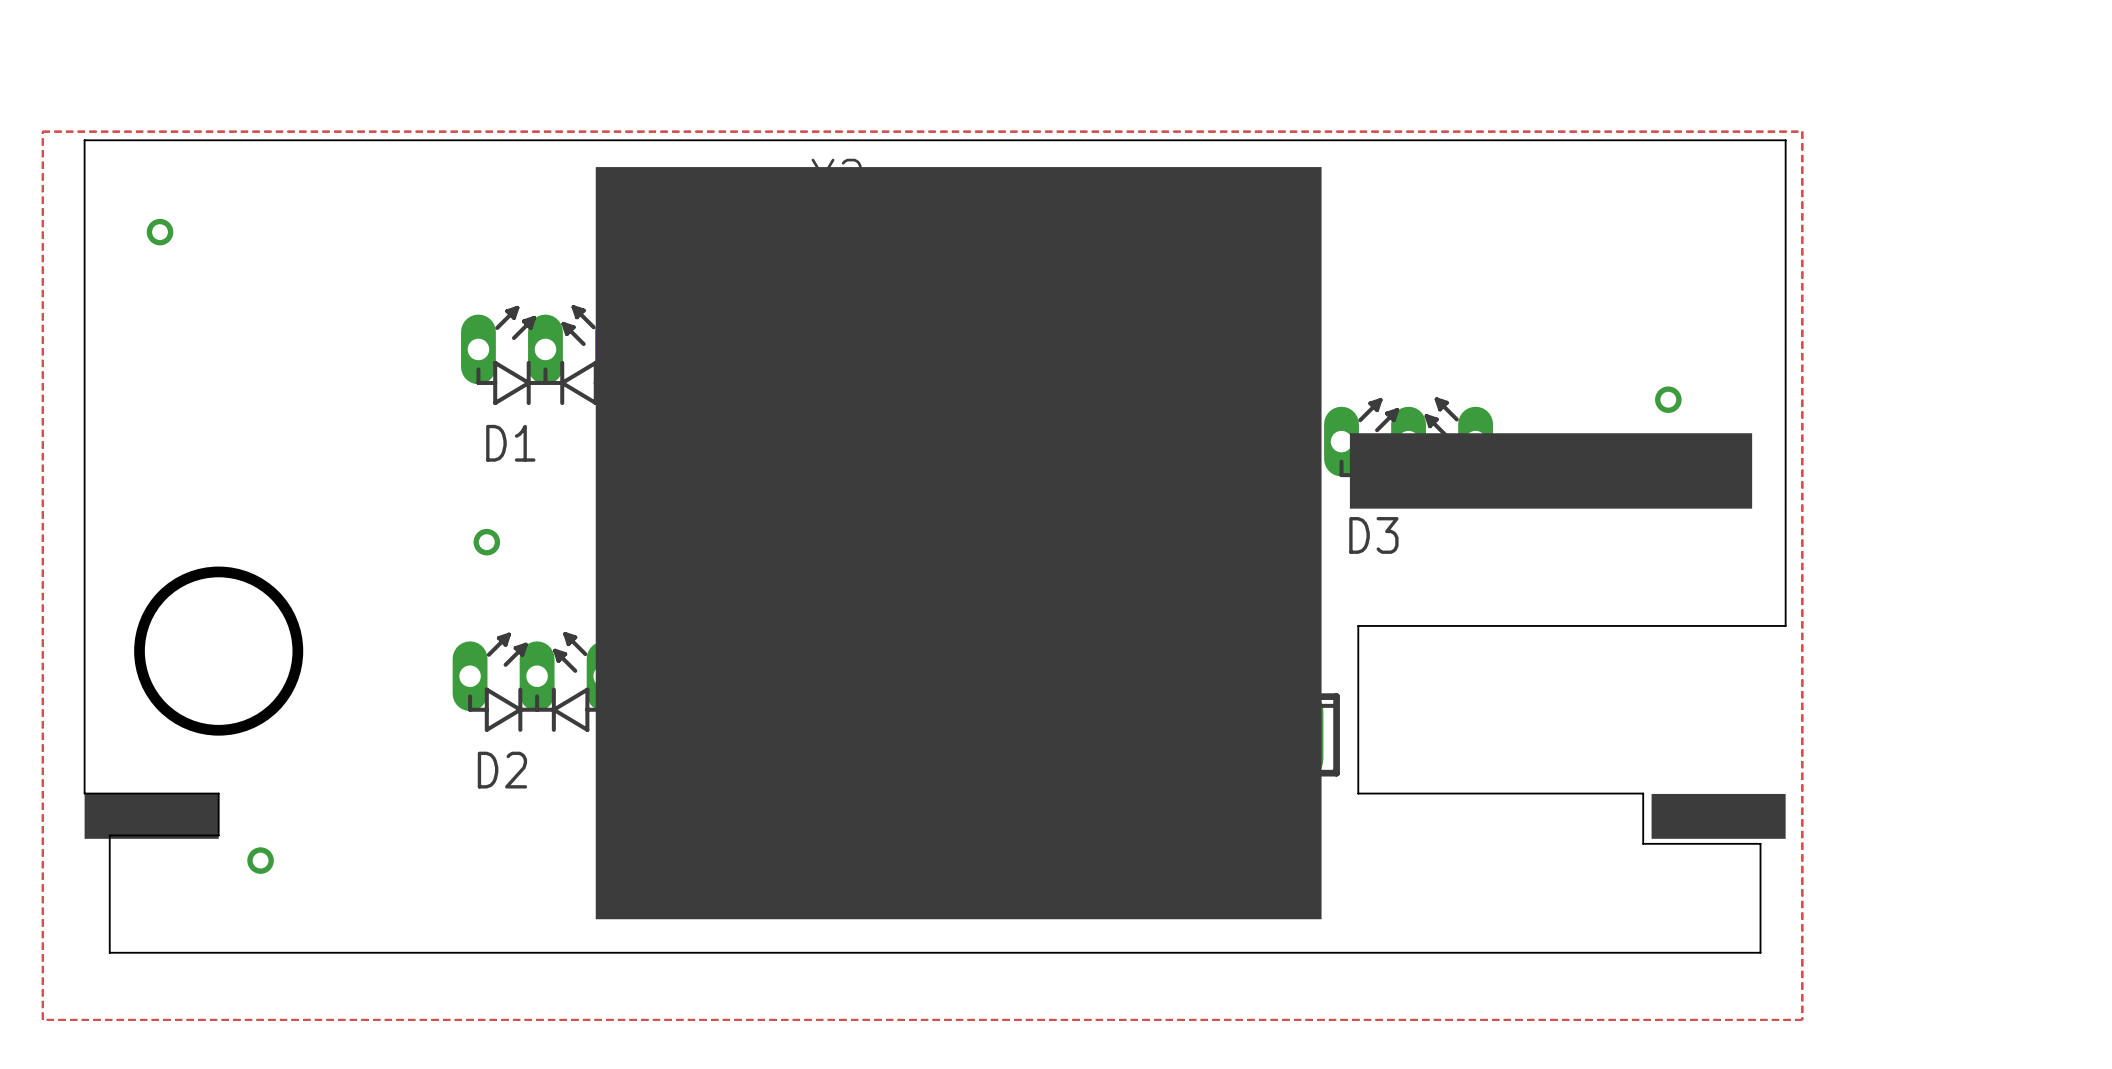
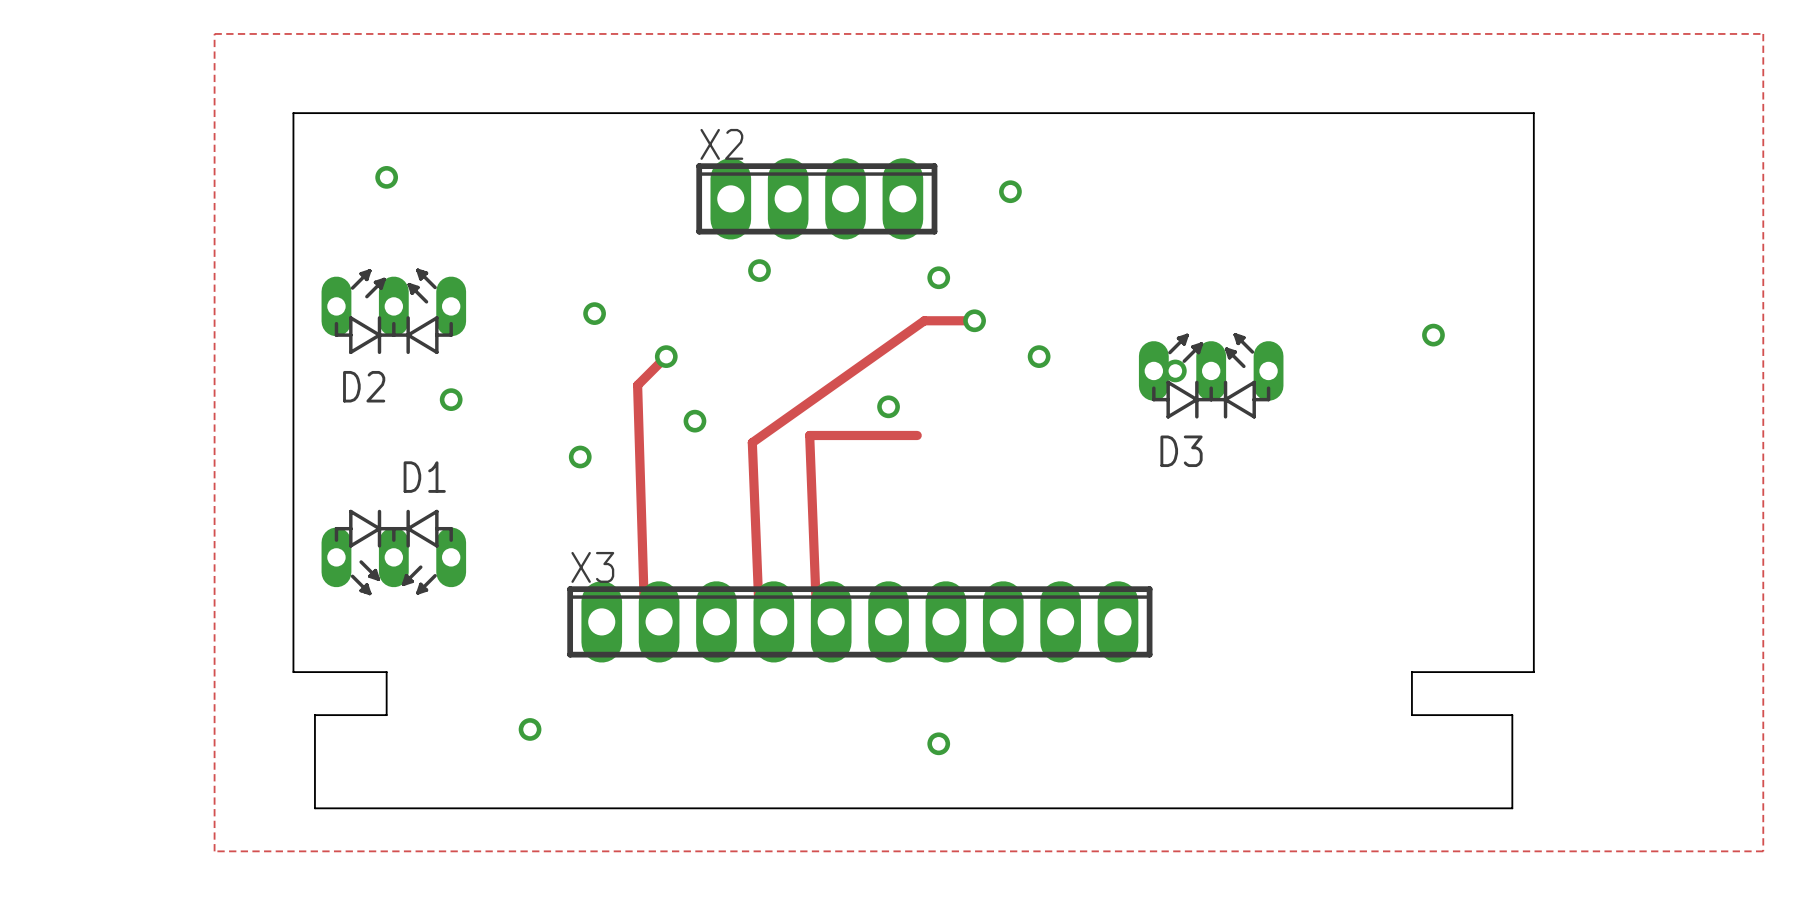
zone outline: (42, 131) (1802, 131) (1802, 1019) (42, 1019) (42, 131) -> (214, 33) (214, 851) (1763, 851) (1763, 33) (214, 33)
board edge: (335, 140) (84, 140) (84, 793) (218, 793) (218, 835) (109, 835) (109, 952) (361, 952) -> (293, 113) (293, 672) (386, 672) (386, 715) (314, 715) (314, 808)
drawing: [595, 167, 1753, 920] -> none
via: none -> (386, 177)
via: (160, 232) -> none
D1 rotation: 0° (545, 355) -> 180° (393, 552)
D1 position: (545, 355) -> (393, 552)
track: none -> (974, 320) (924, 320) (752, 442) (759, 621)
via: none -> (974, 320)
track: none -> (666, 356) (637, 385) (644, 621)
via: none -> (666, 356)
via: none -> (1039, 356)
via: none -> (1175, 370)
via: none -> (694, 421)
track: none -> (917, 435) (809, 435) (816, 621)
via position: (486, 542) -> (451, 399)
round board edge: [134, 566, 304, 736] -> none
board edge: (1785, 625) (1358, 625) (1358, 793) (1643, 793) -> (1533, 528) (1533, 672) (1411, 672)
D2 position: (537, 681) -> (393, 311)
drawing: [84, 793, 219, 839] -> none
drawing: [1651, 793, 1786, 839] -> none
via: (260, 860) -> none
via: none -> (530, 729)

